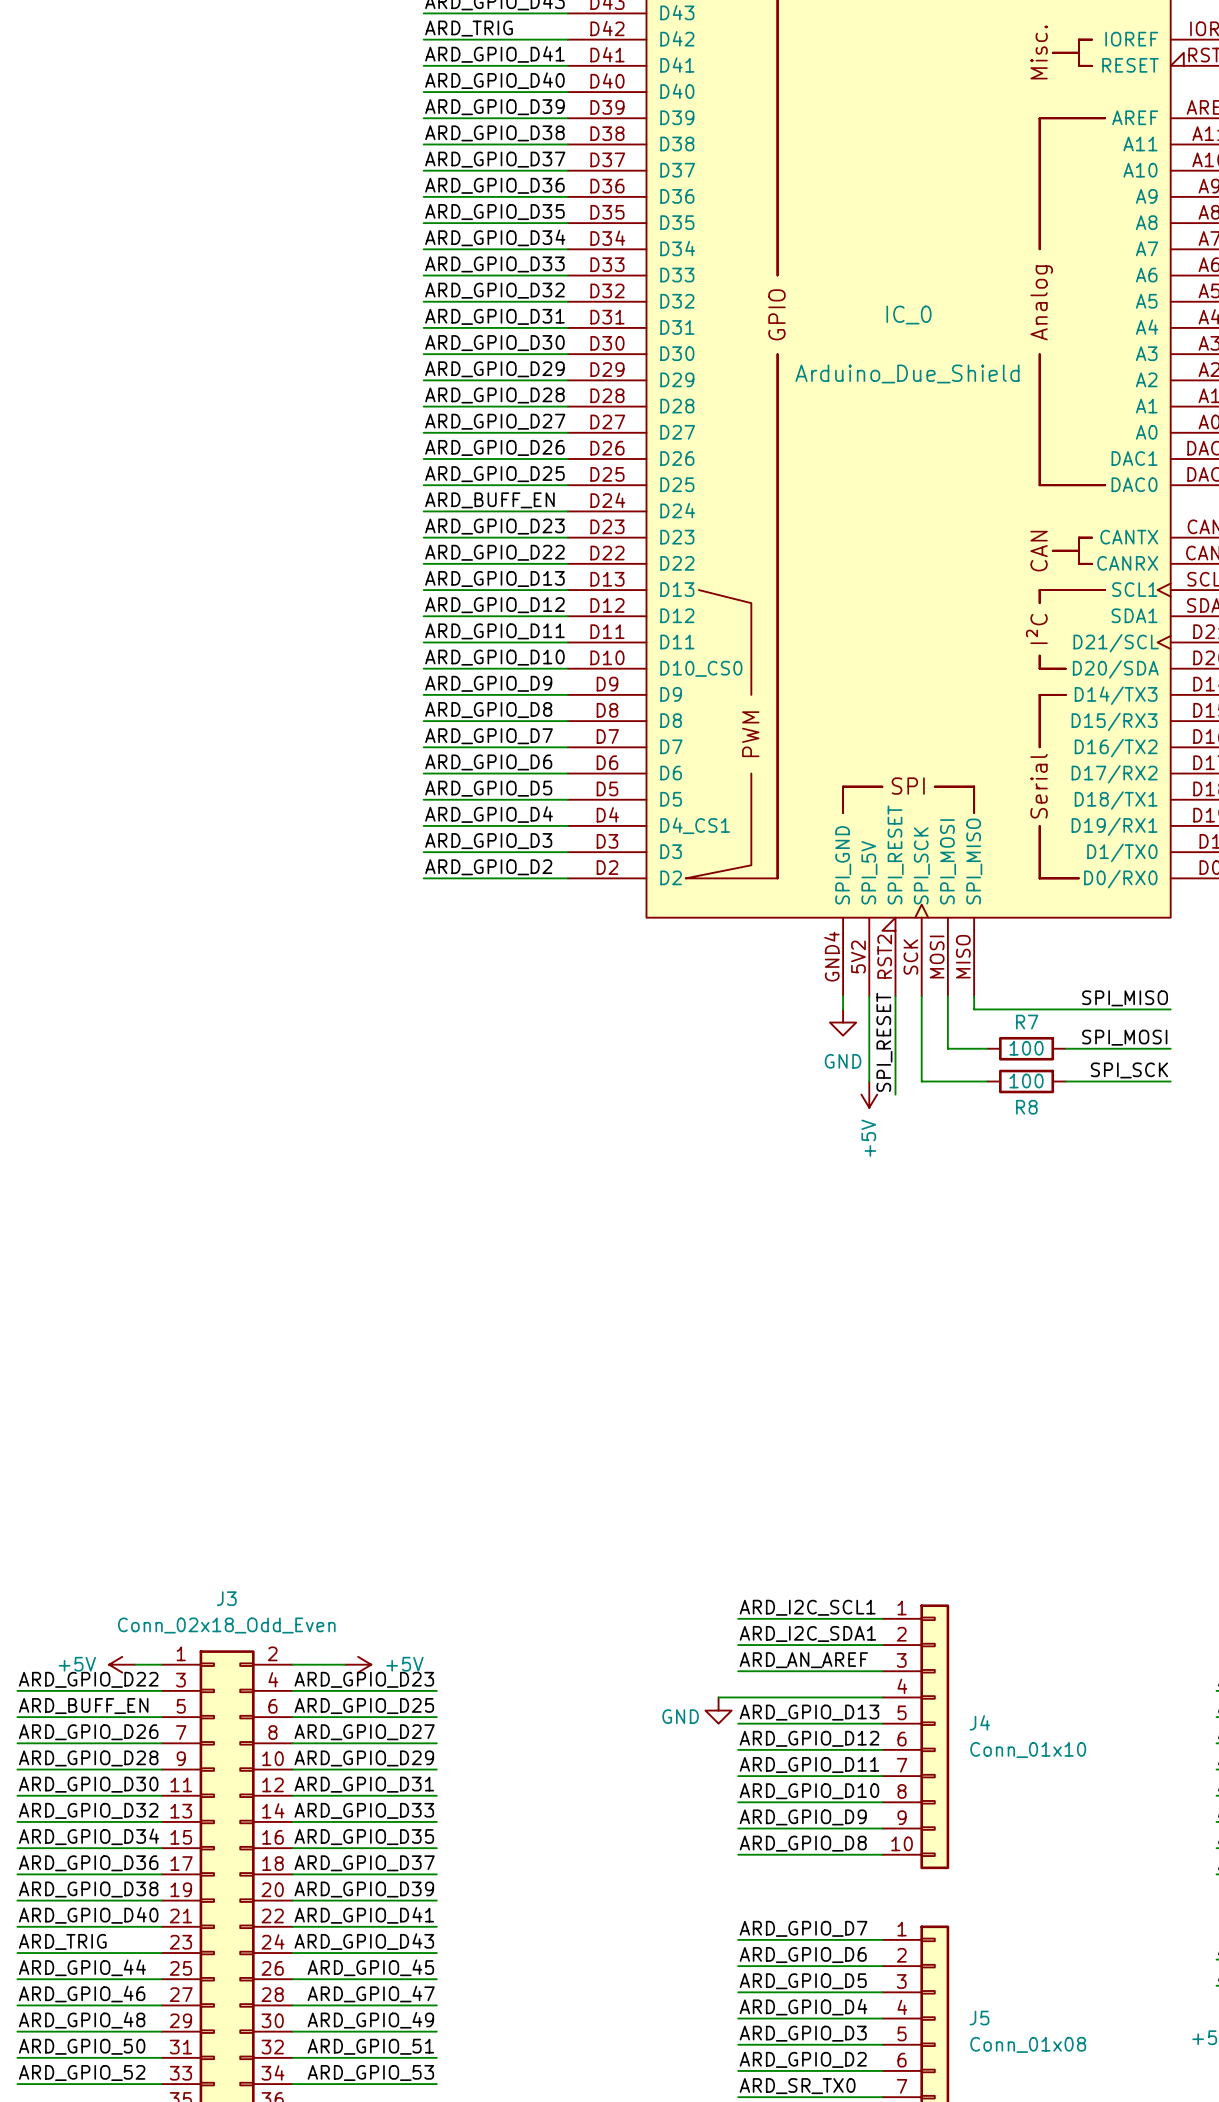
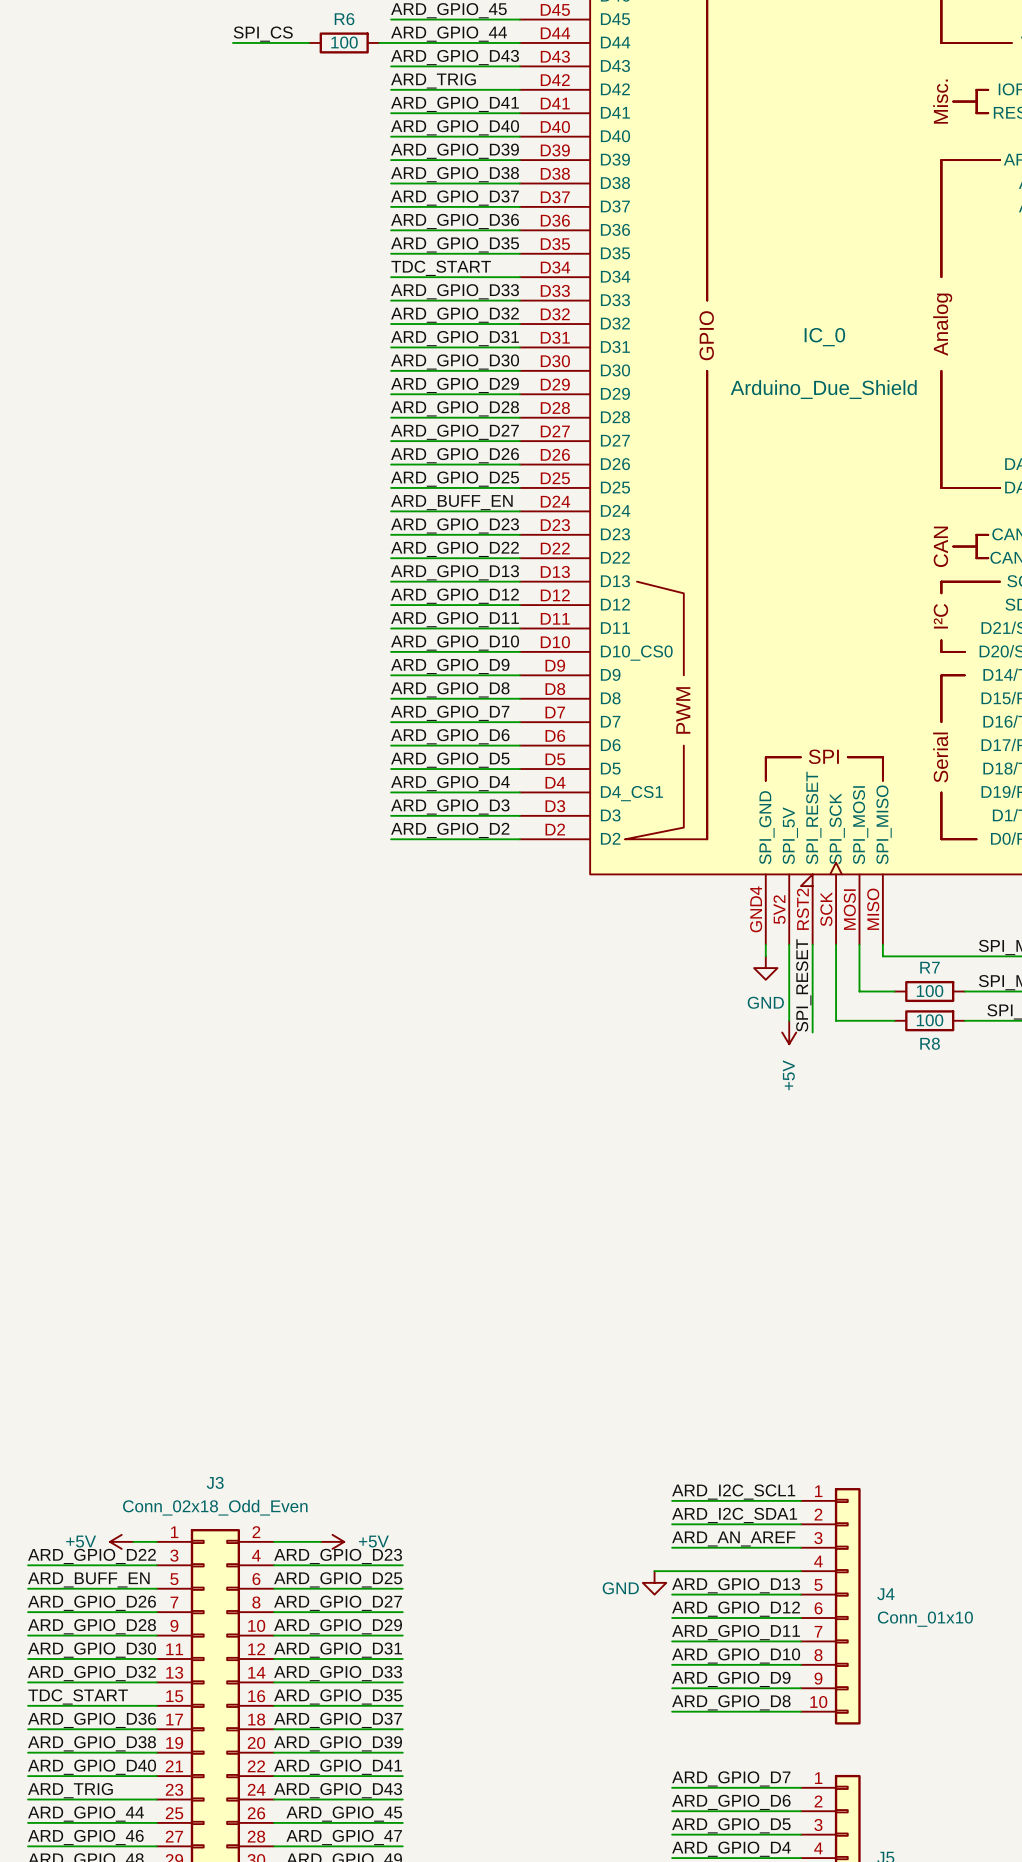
label: ARD_GPIO_D34 (495, 237) -> TDC_START (441, 268)
label: ARD_GPIO_D34 (88, 1836) -> TDC_START (78, 1696)

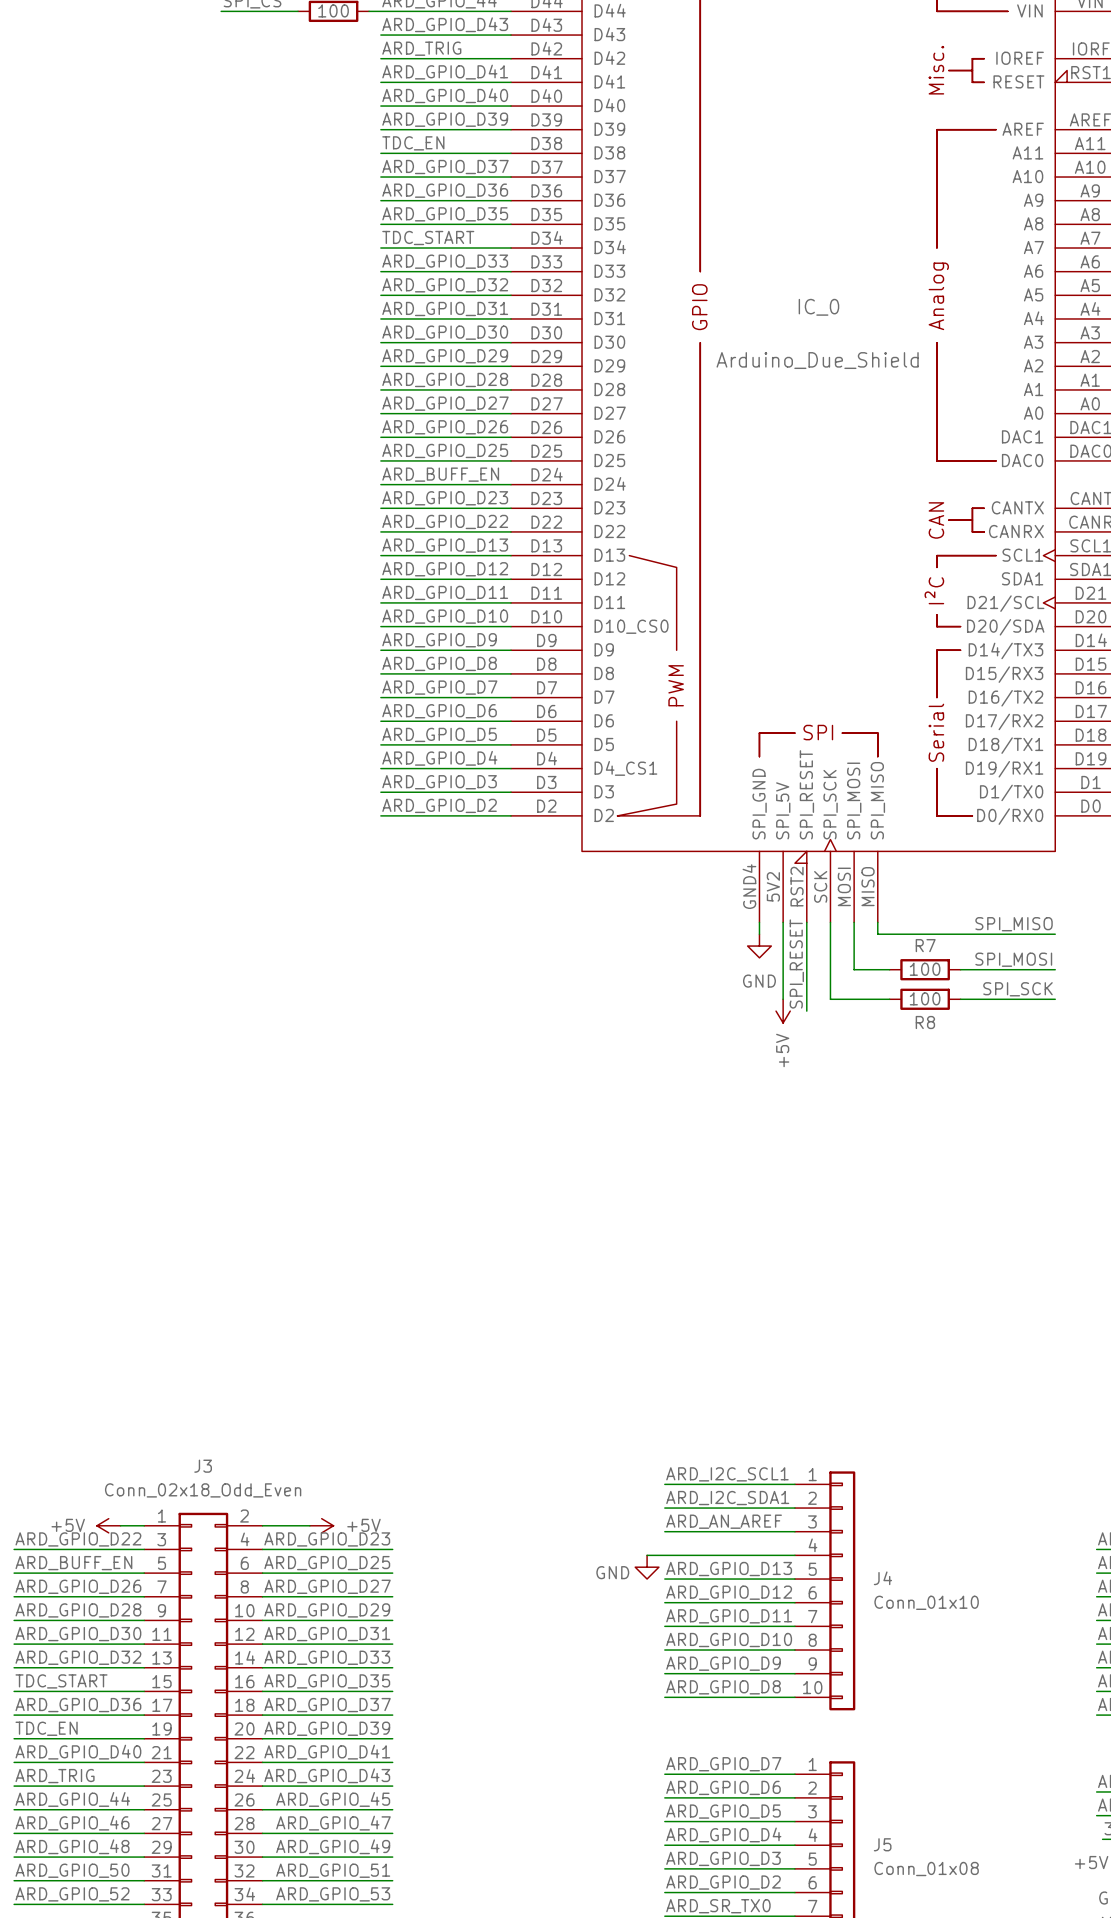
label: ARD_GPIO_D38 (455, 174) -> TDC_EN (413, 143)
label: ARD_GPIO_D38 (92, 1743) -> TDC_EN (46, 1728)

